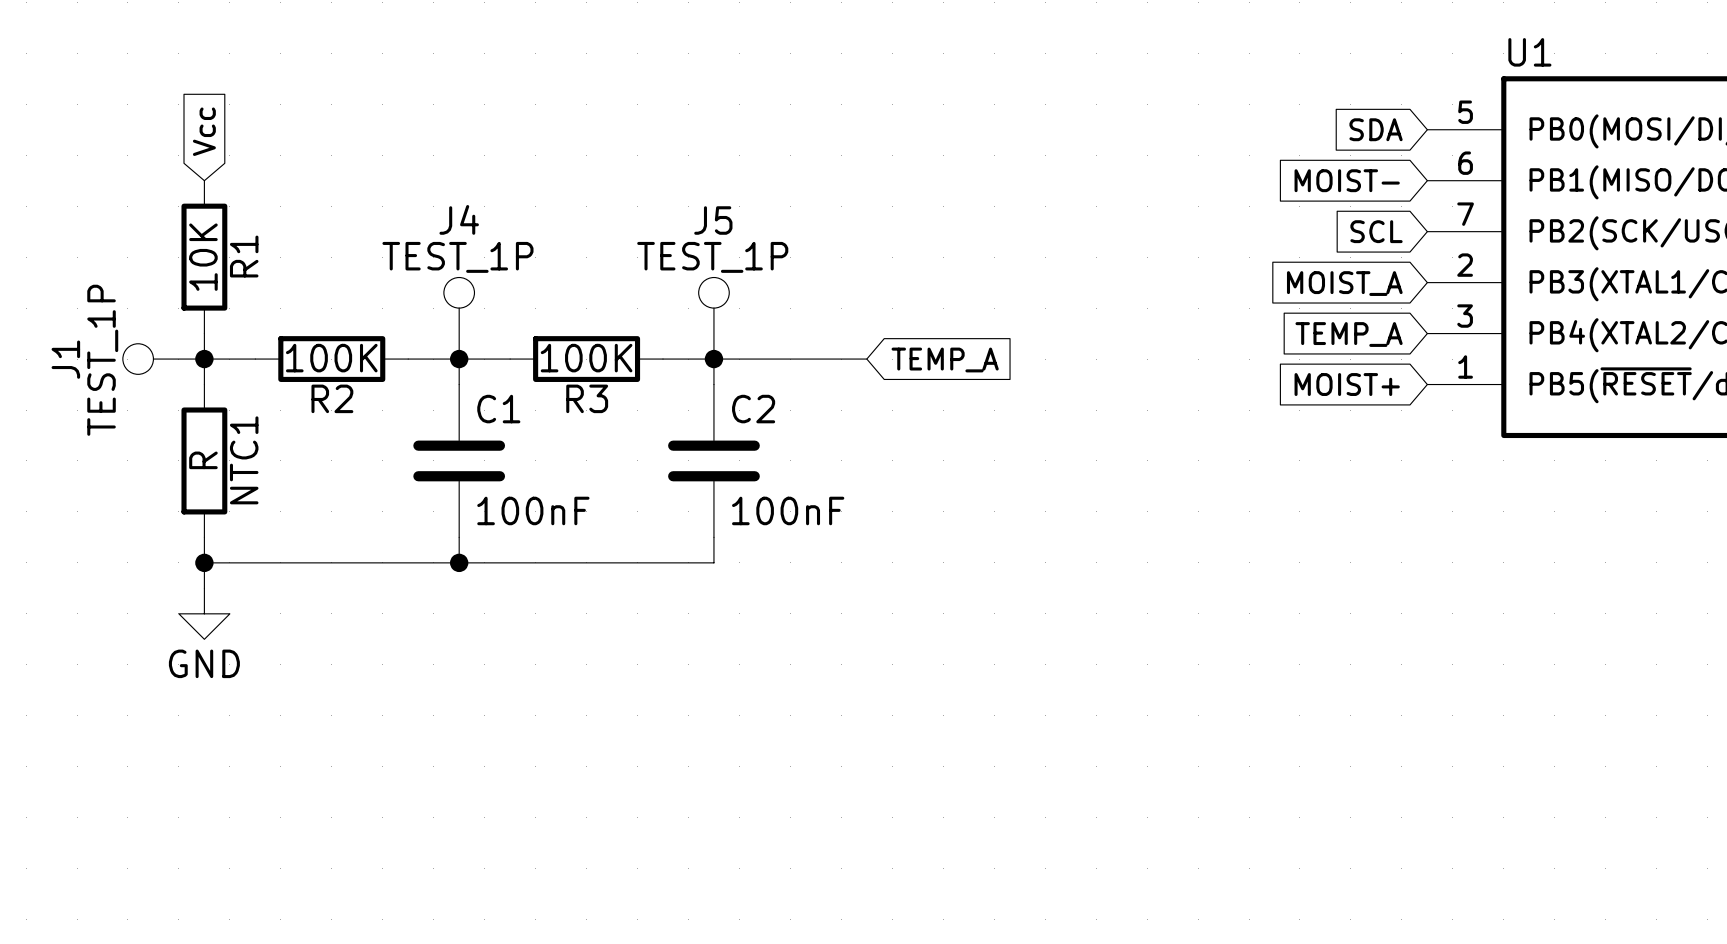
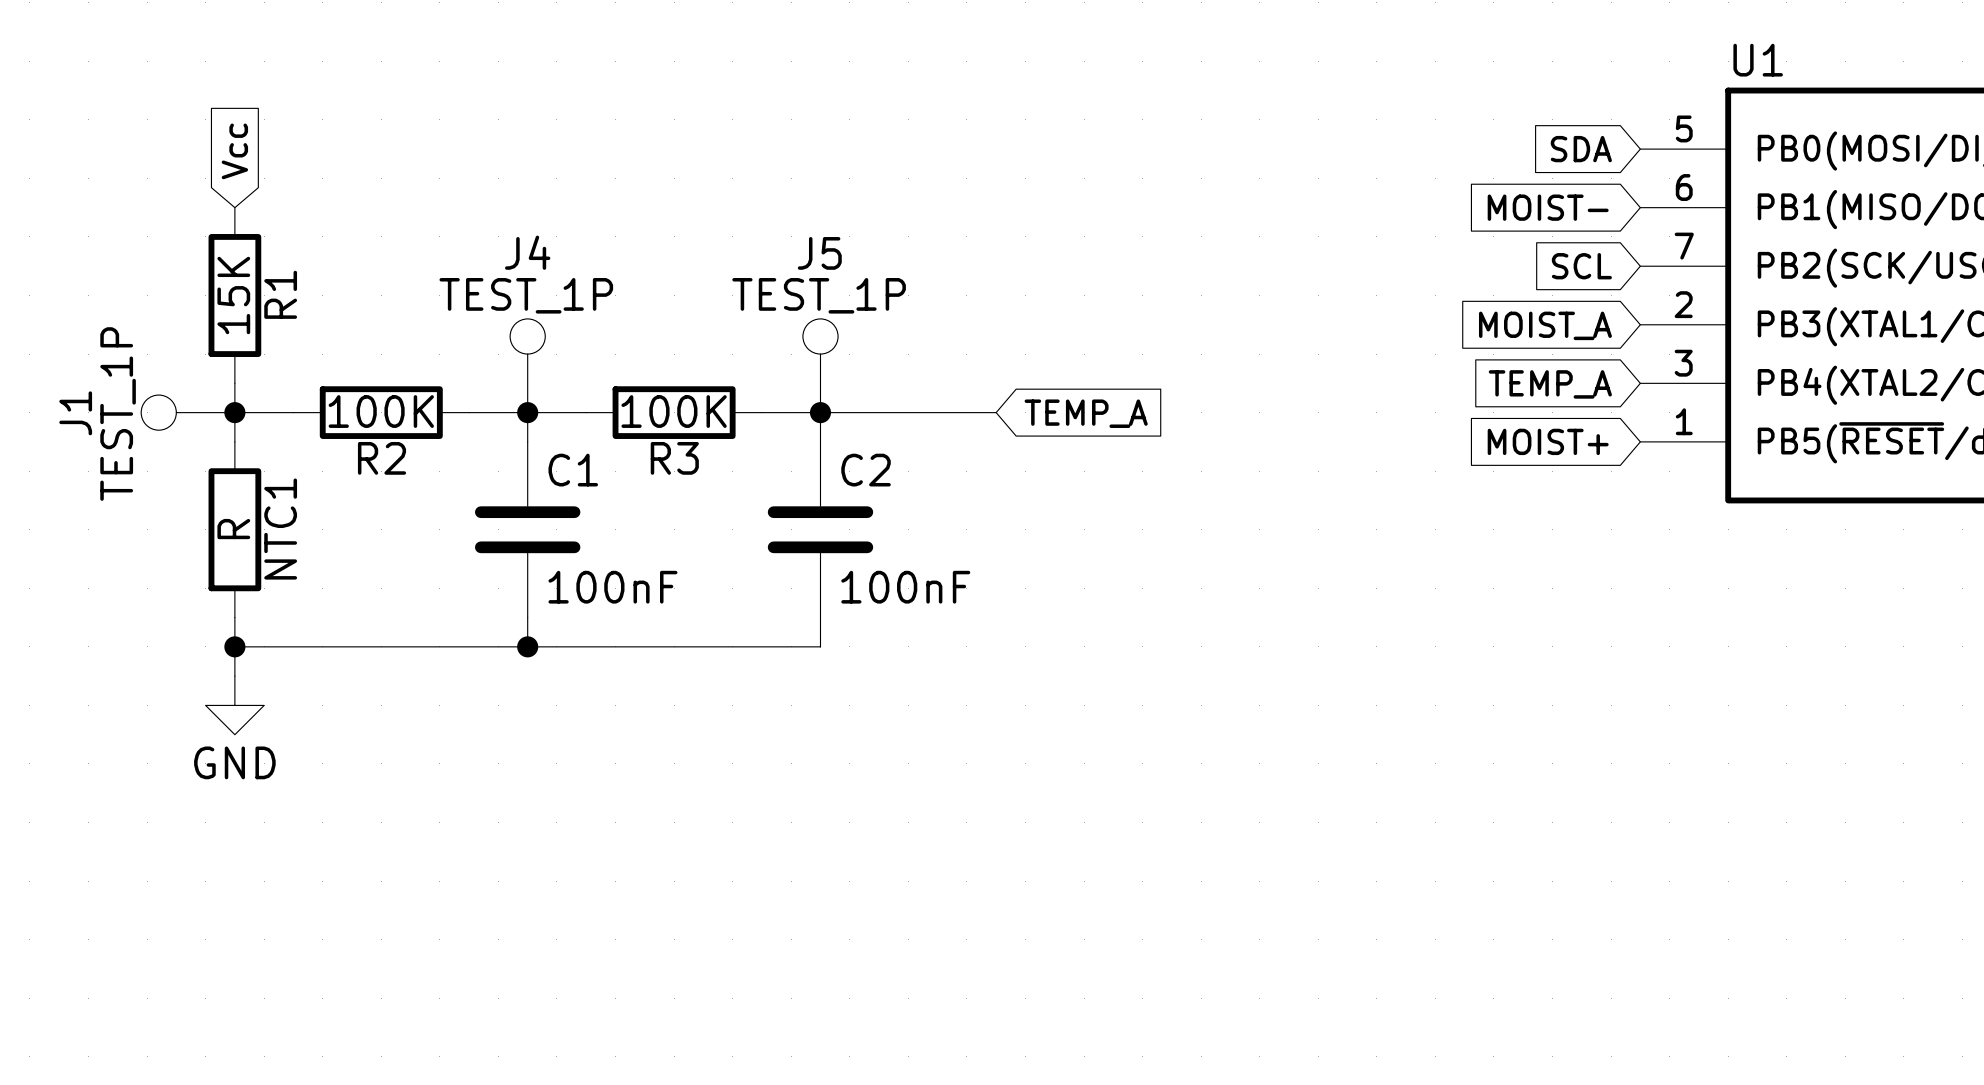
R1 value: 10K (203, 257) -> 15K (233, 295)

